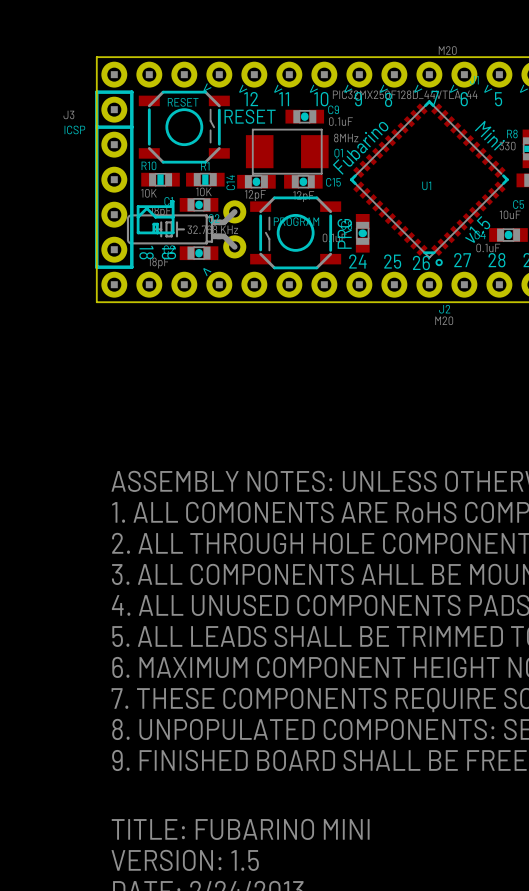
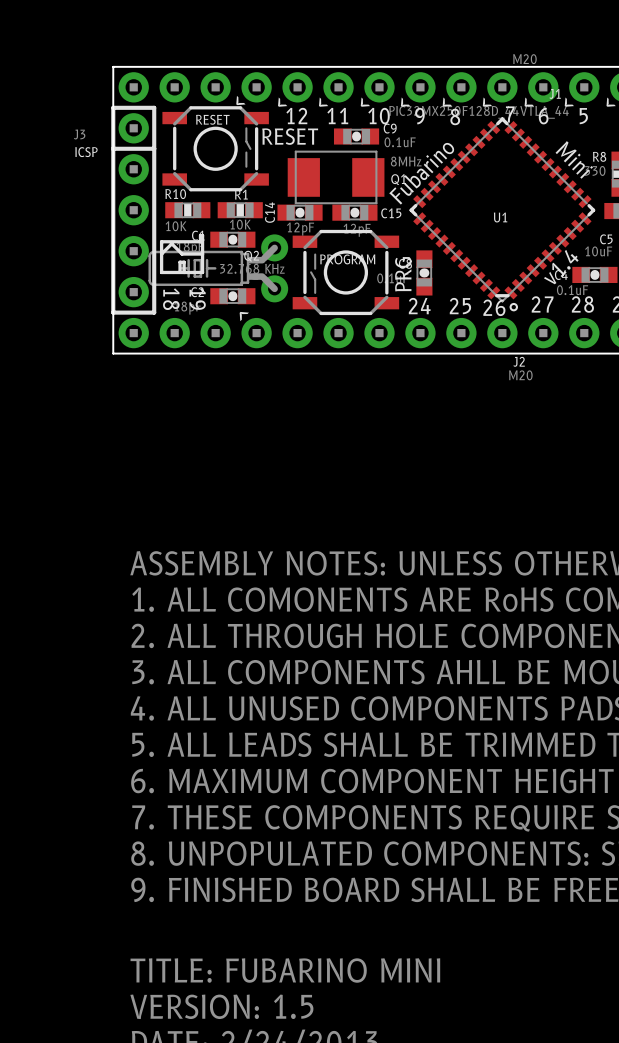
text: v1.5 (477, 229) -> v1.4 (561, 267)

